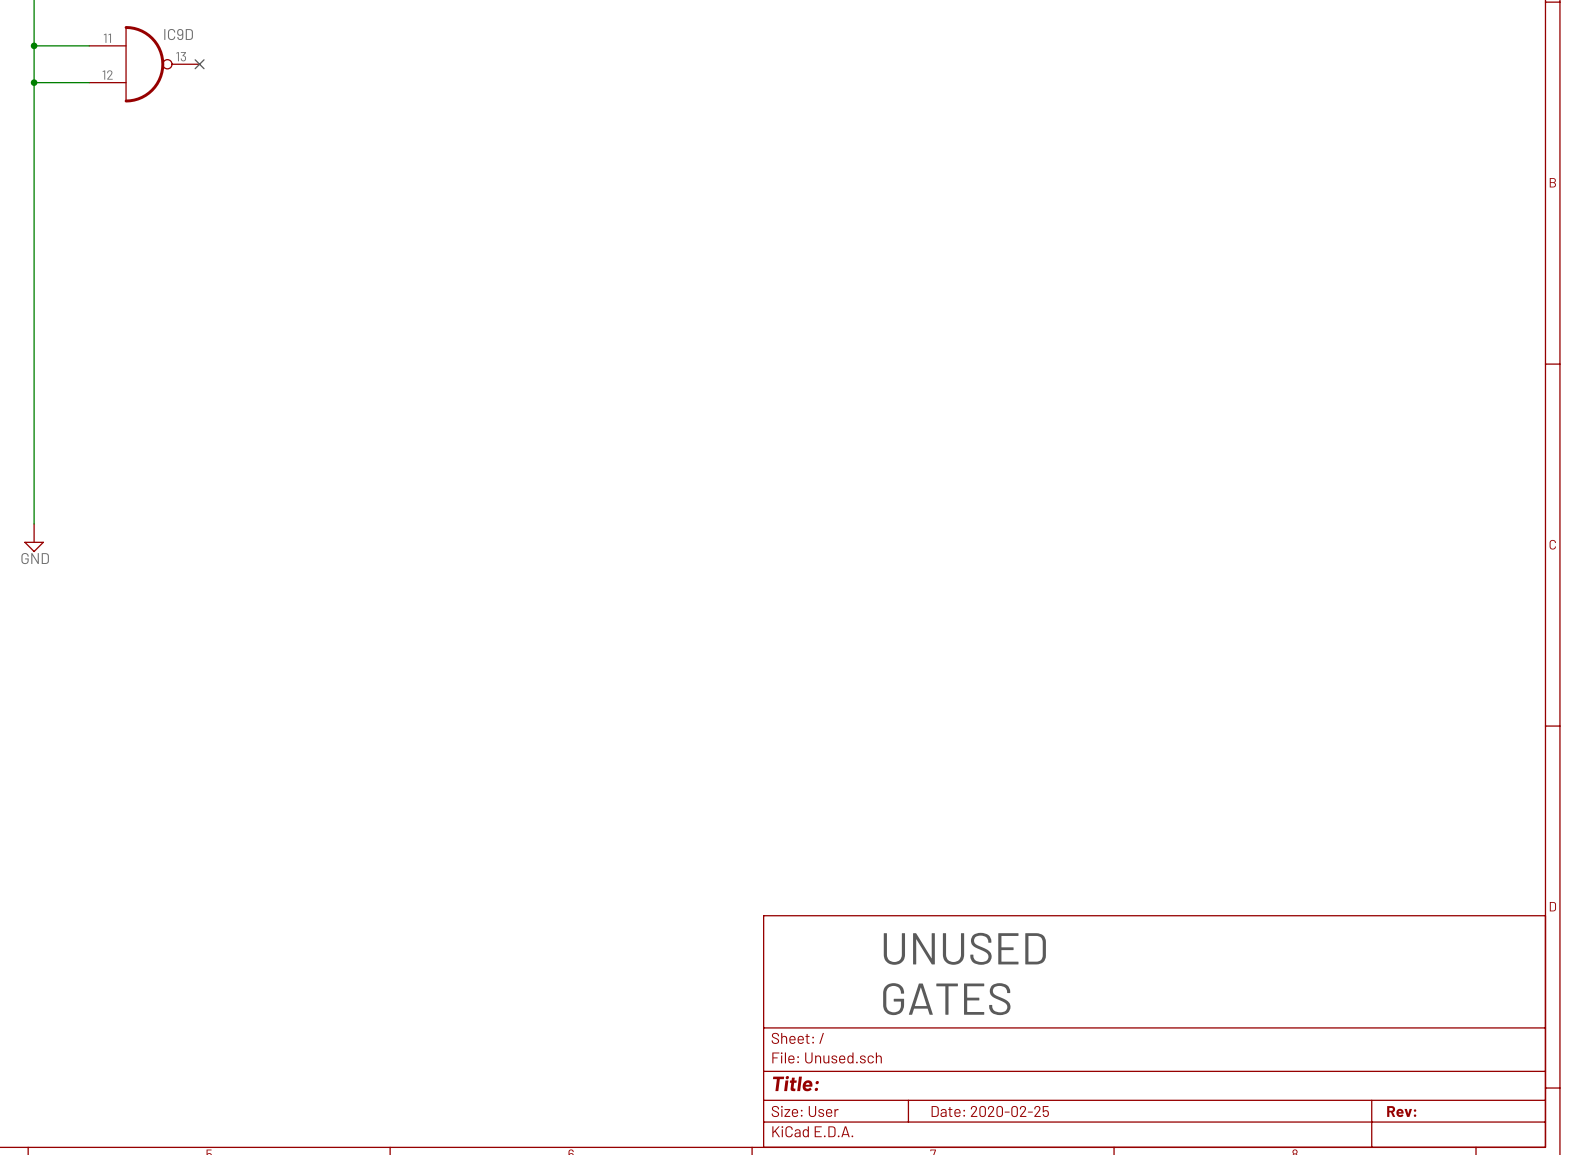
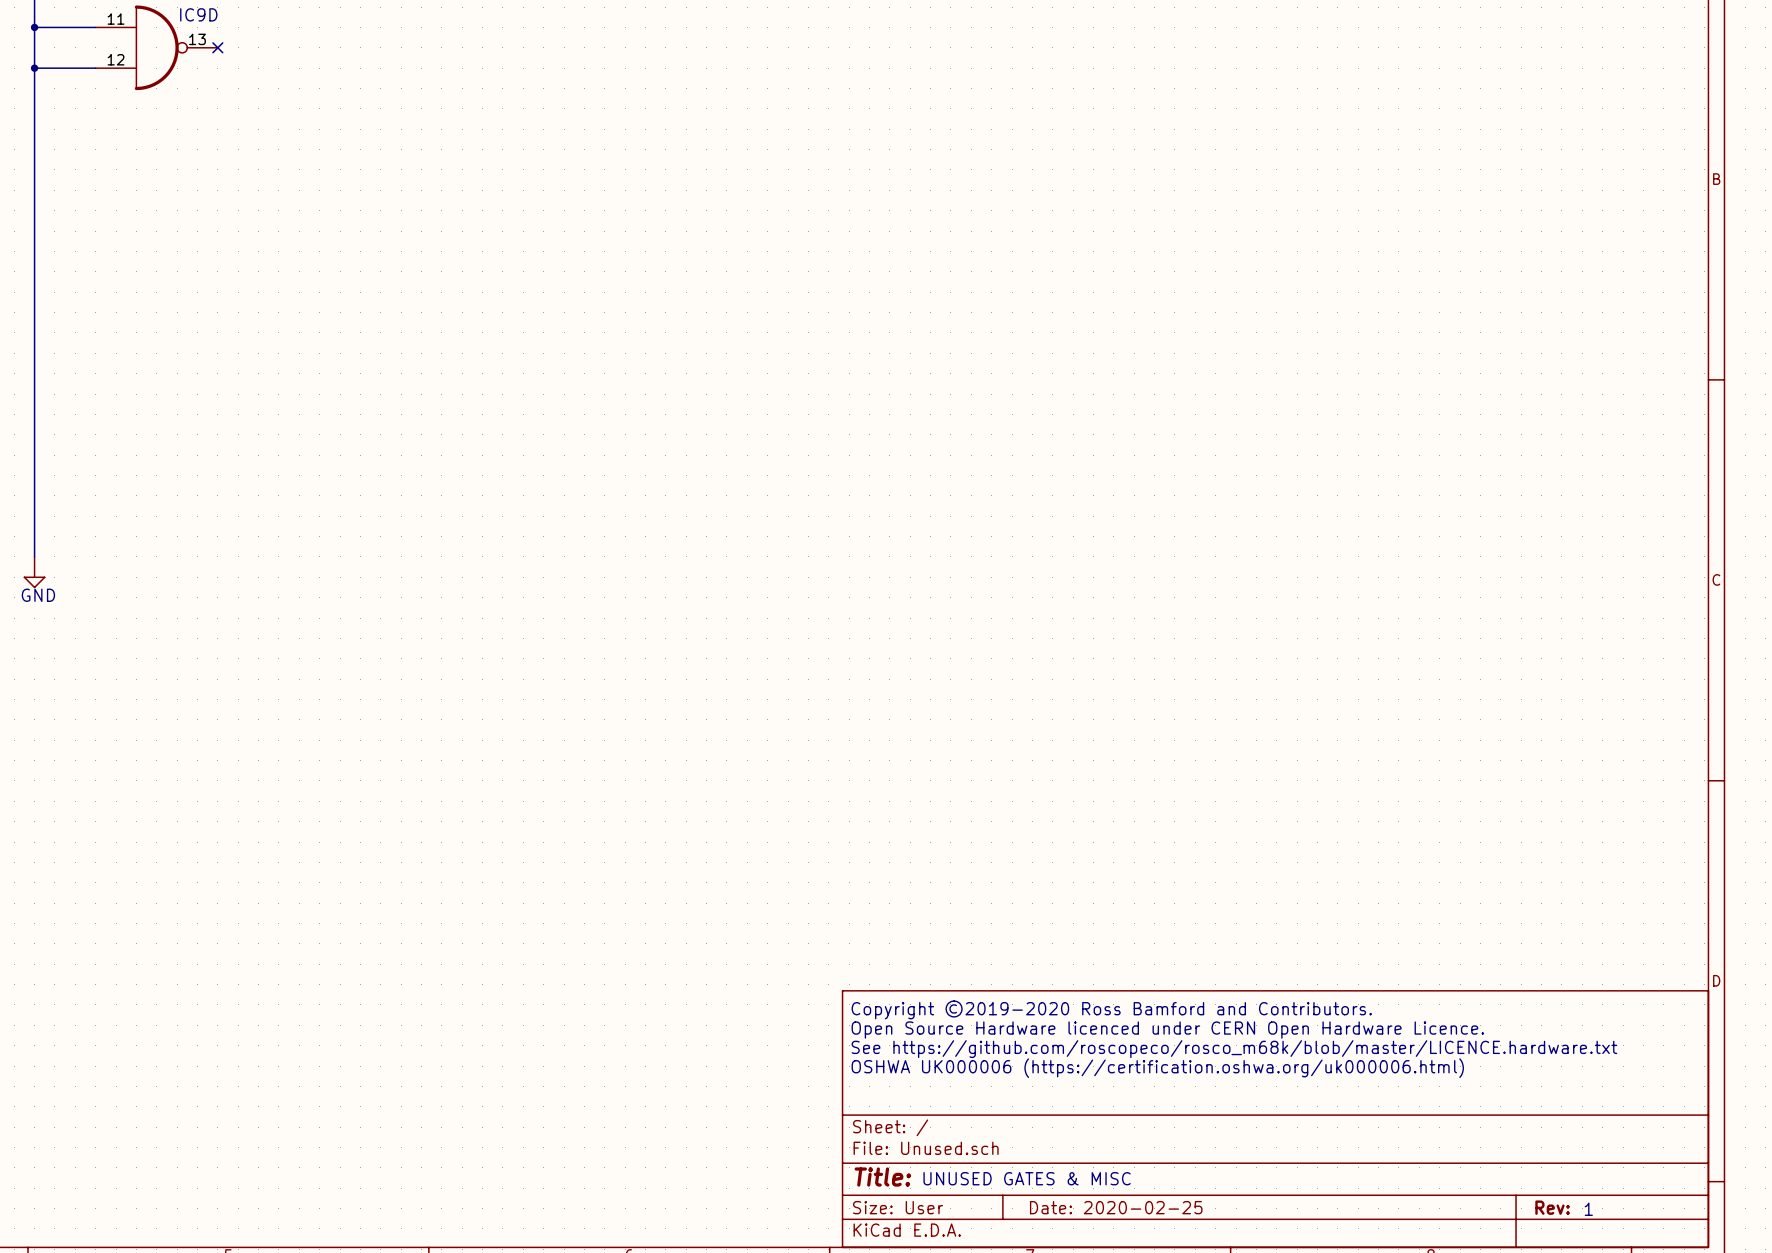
text: none -> Copyright ©2019-2020 Ross Bamford and Contributors. (1111, 1009)
text: UNUSED (964, 948) -> none
text: none -> Open Source Hardware licenced under CERN Open Hardware Licence. (1167, 1030)
text: none -> See https://github.com/roscopeco/rosco_m68k/blob/master/LICENCE.hardware.txt (1234, 1049)
text: none -> OSHWA UK000006 (https://certification.oshwa.org/uk000006.html) (1157, 1068)
text: GATES (946, 999) -> none
text: none -> UNUSED GATES & MISC (1027, 1178)
text: none -> 1 (1588, 1209)

